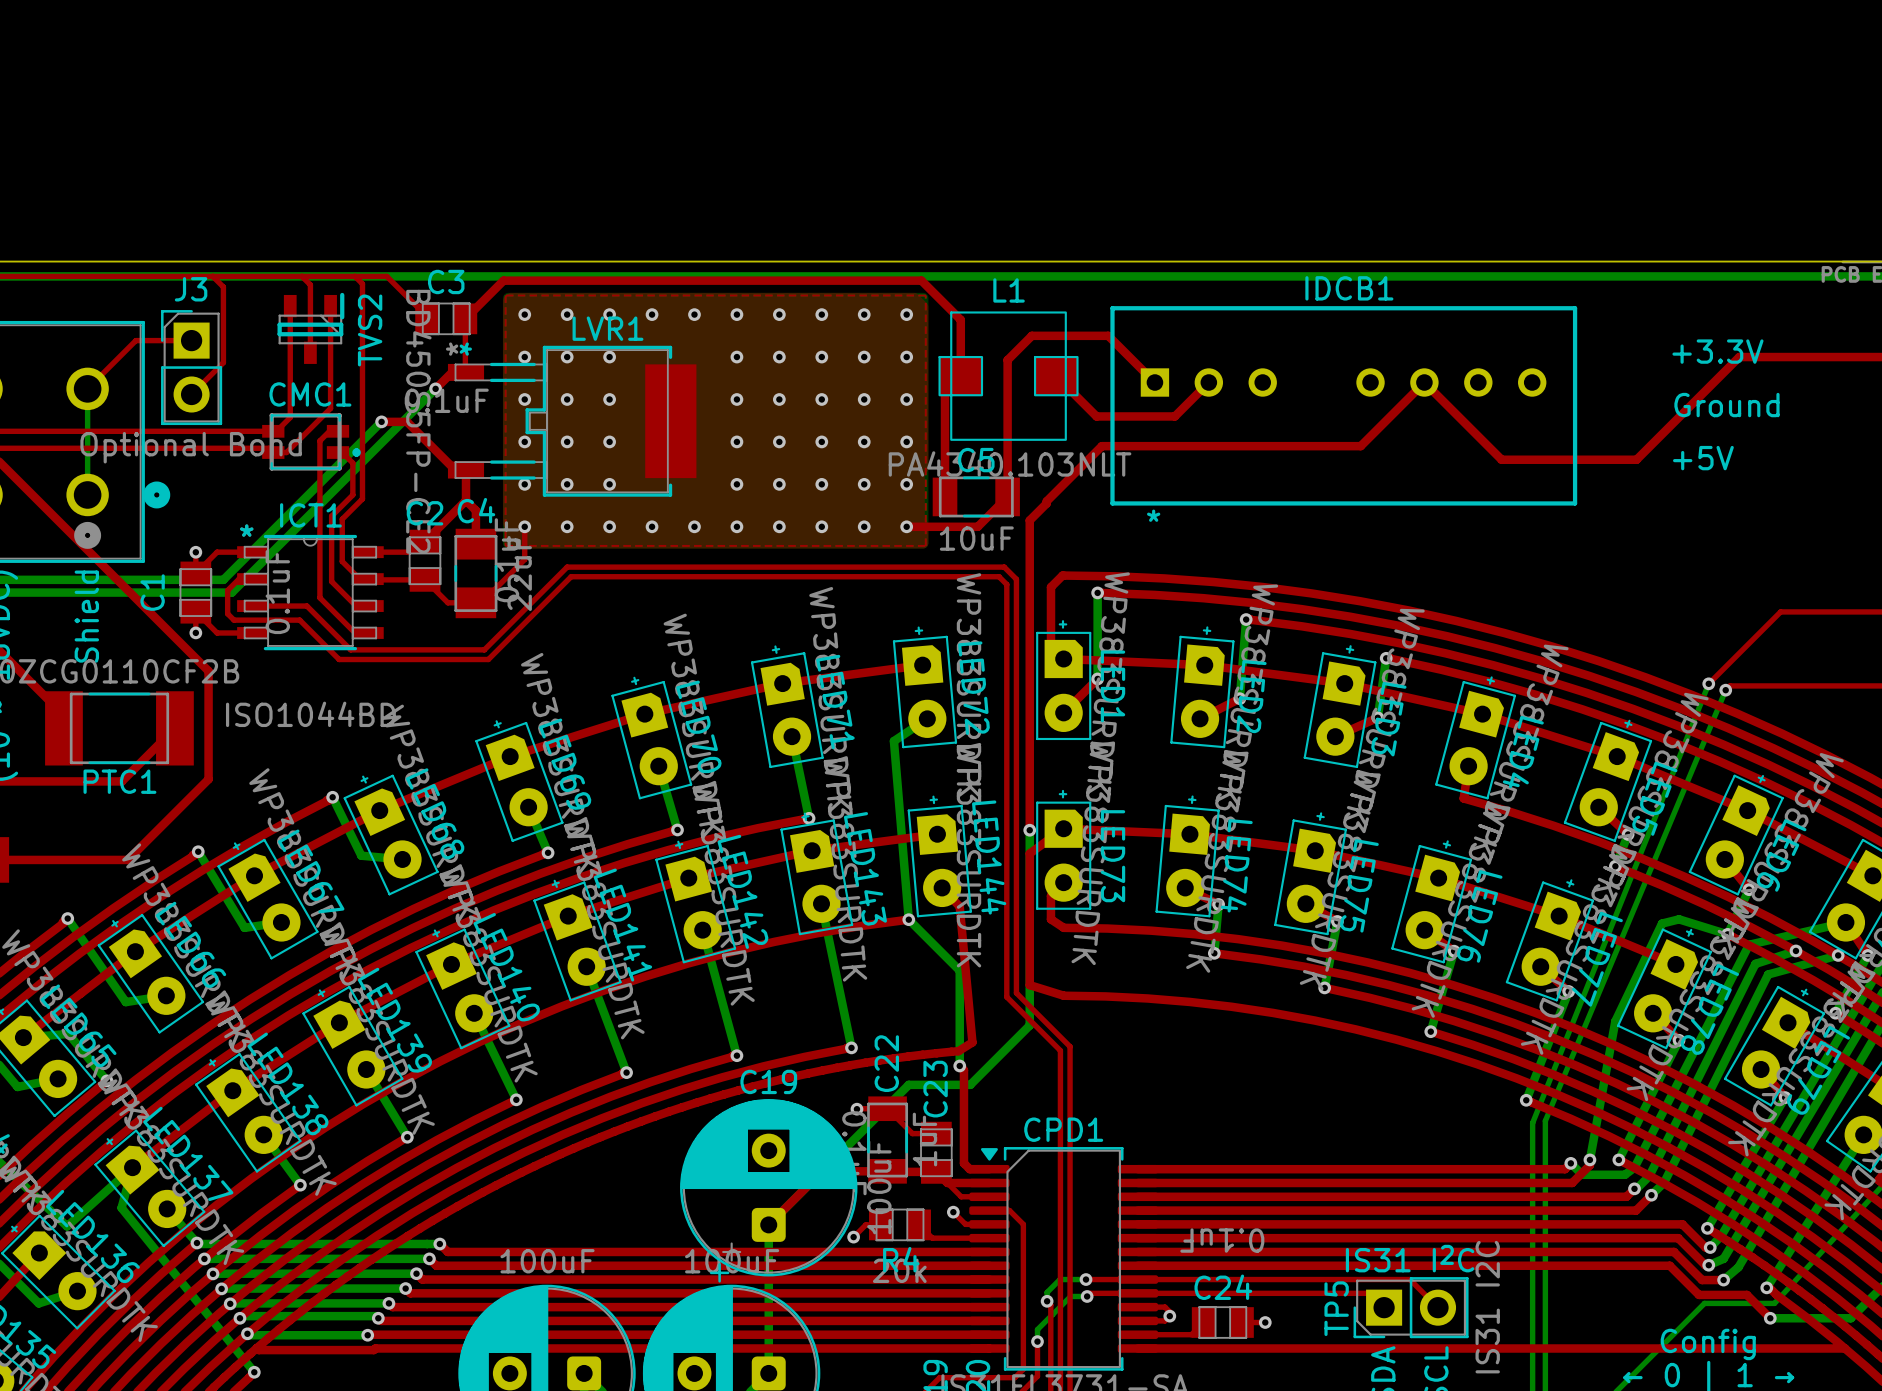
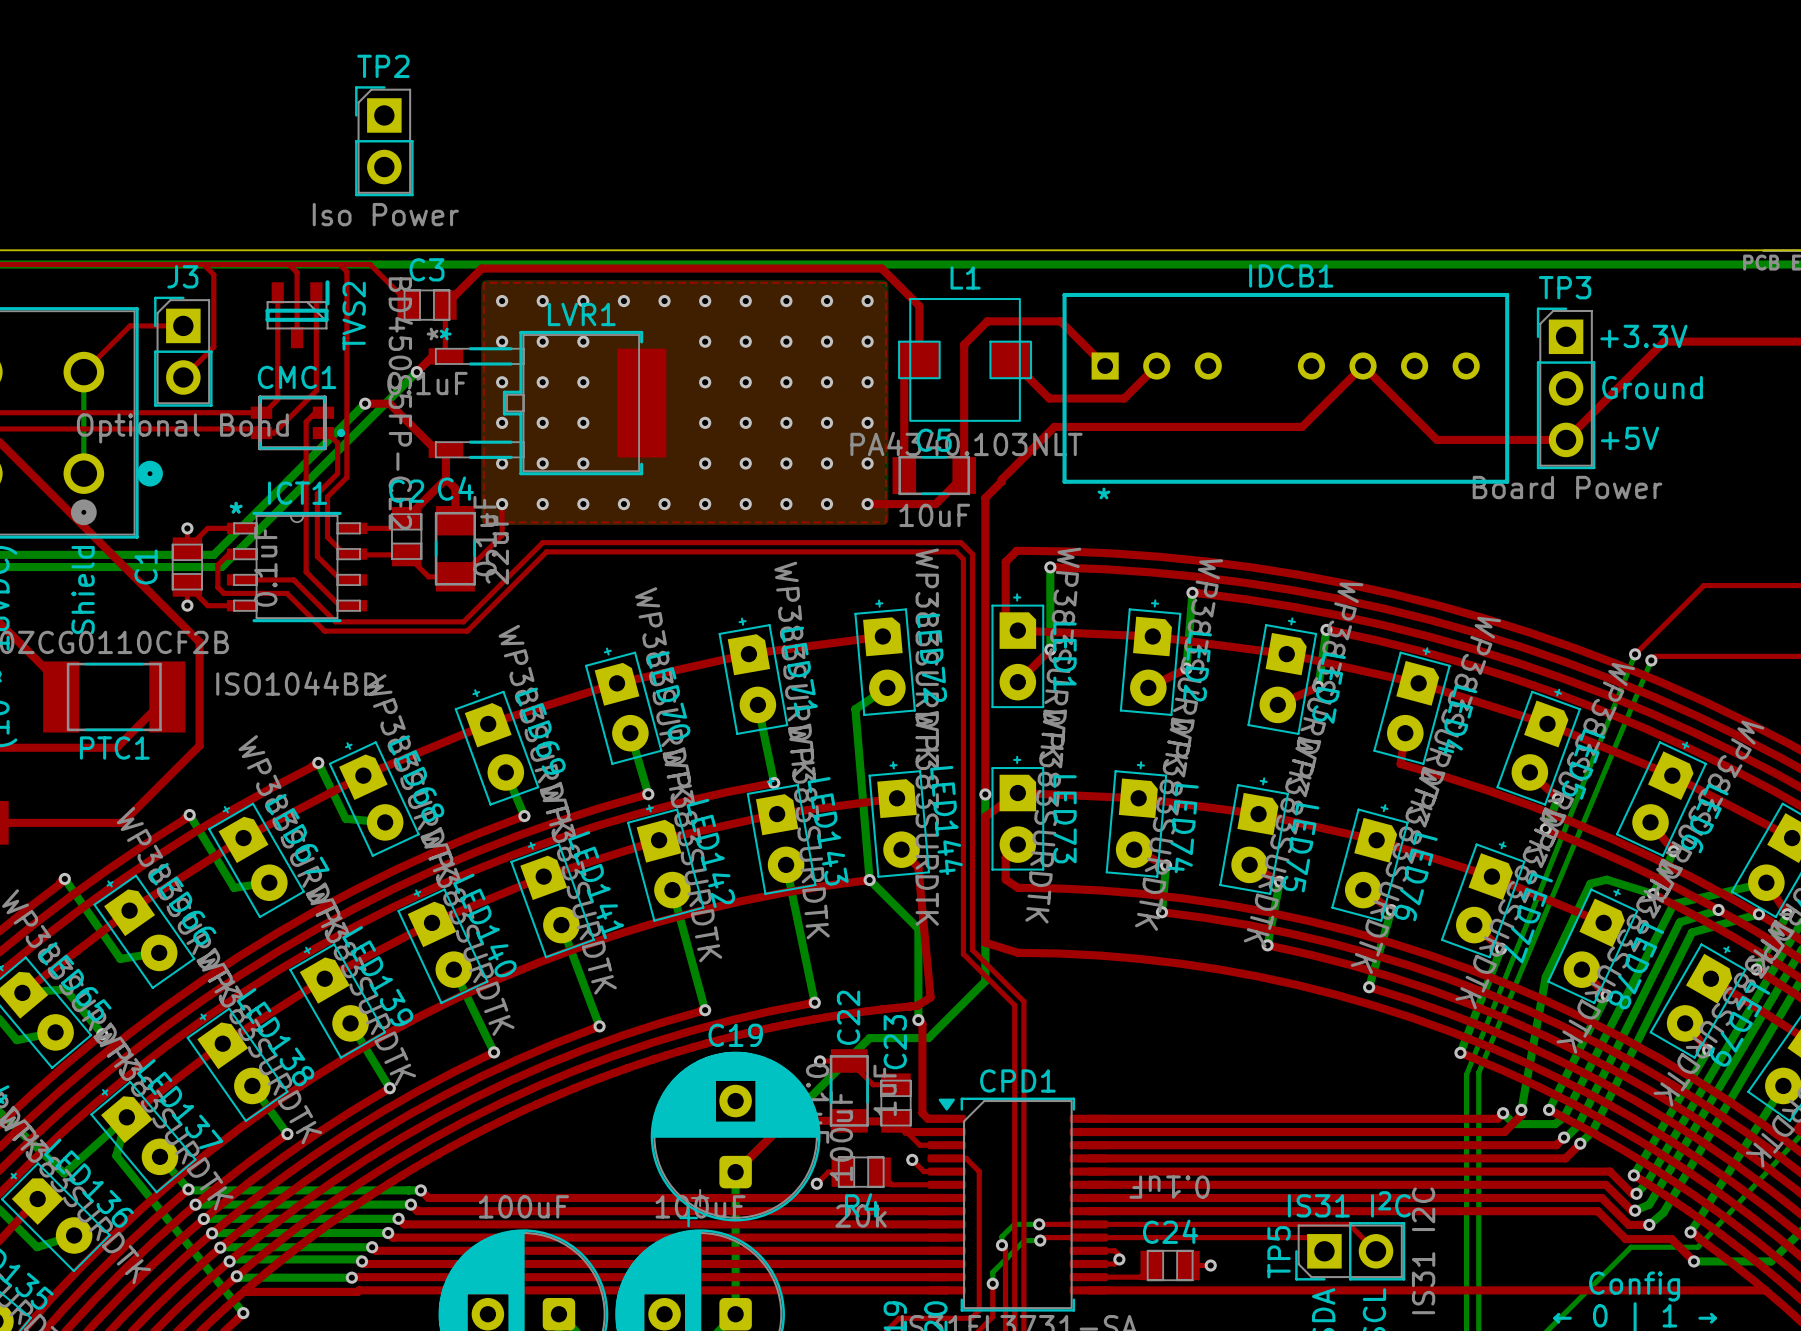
TP2: none -> Iso Power (384, 141)
TP3: none -> Board Power (1566, 388)

